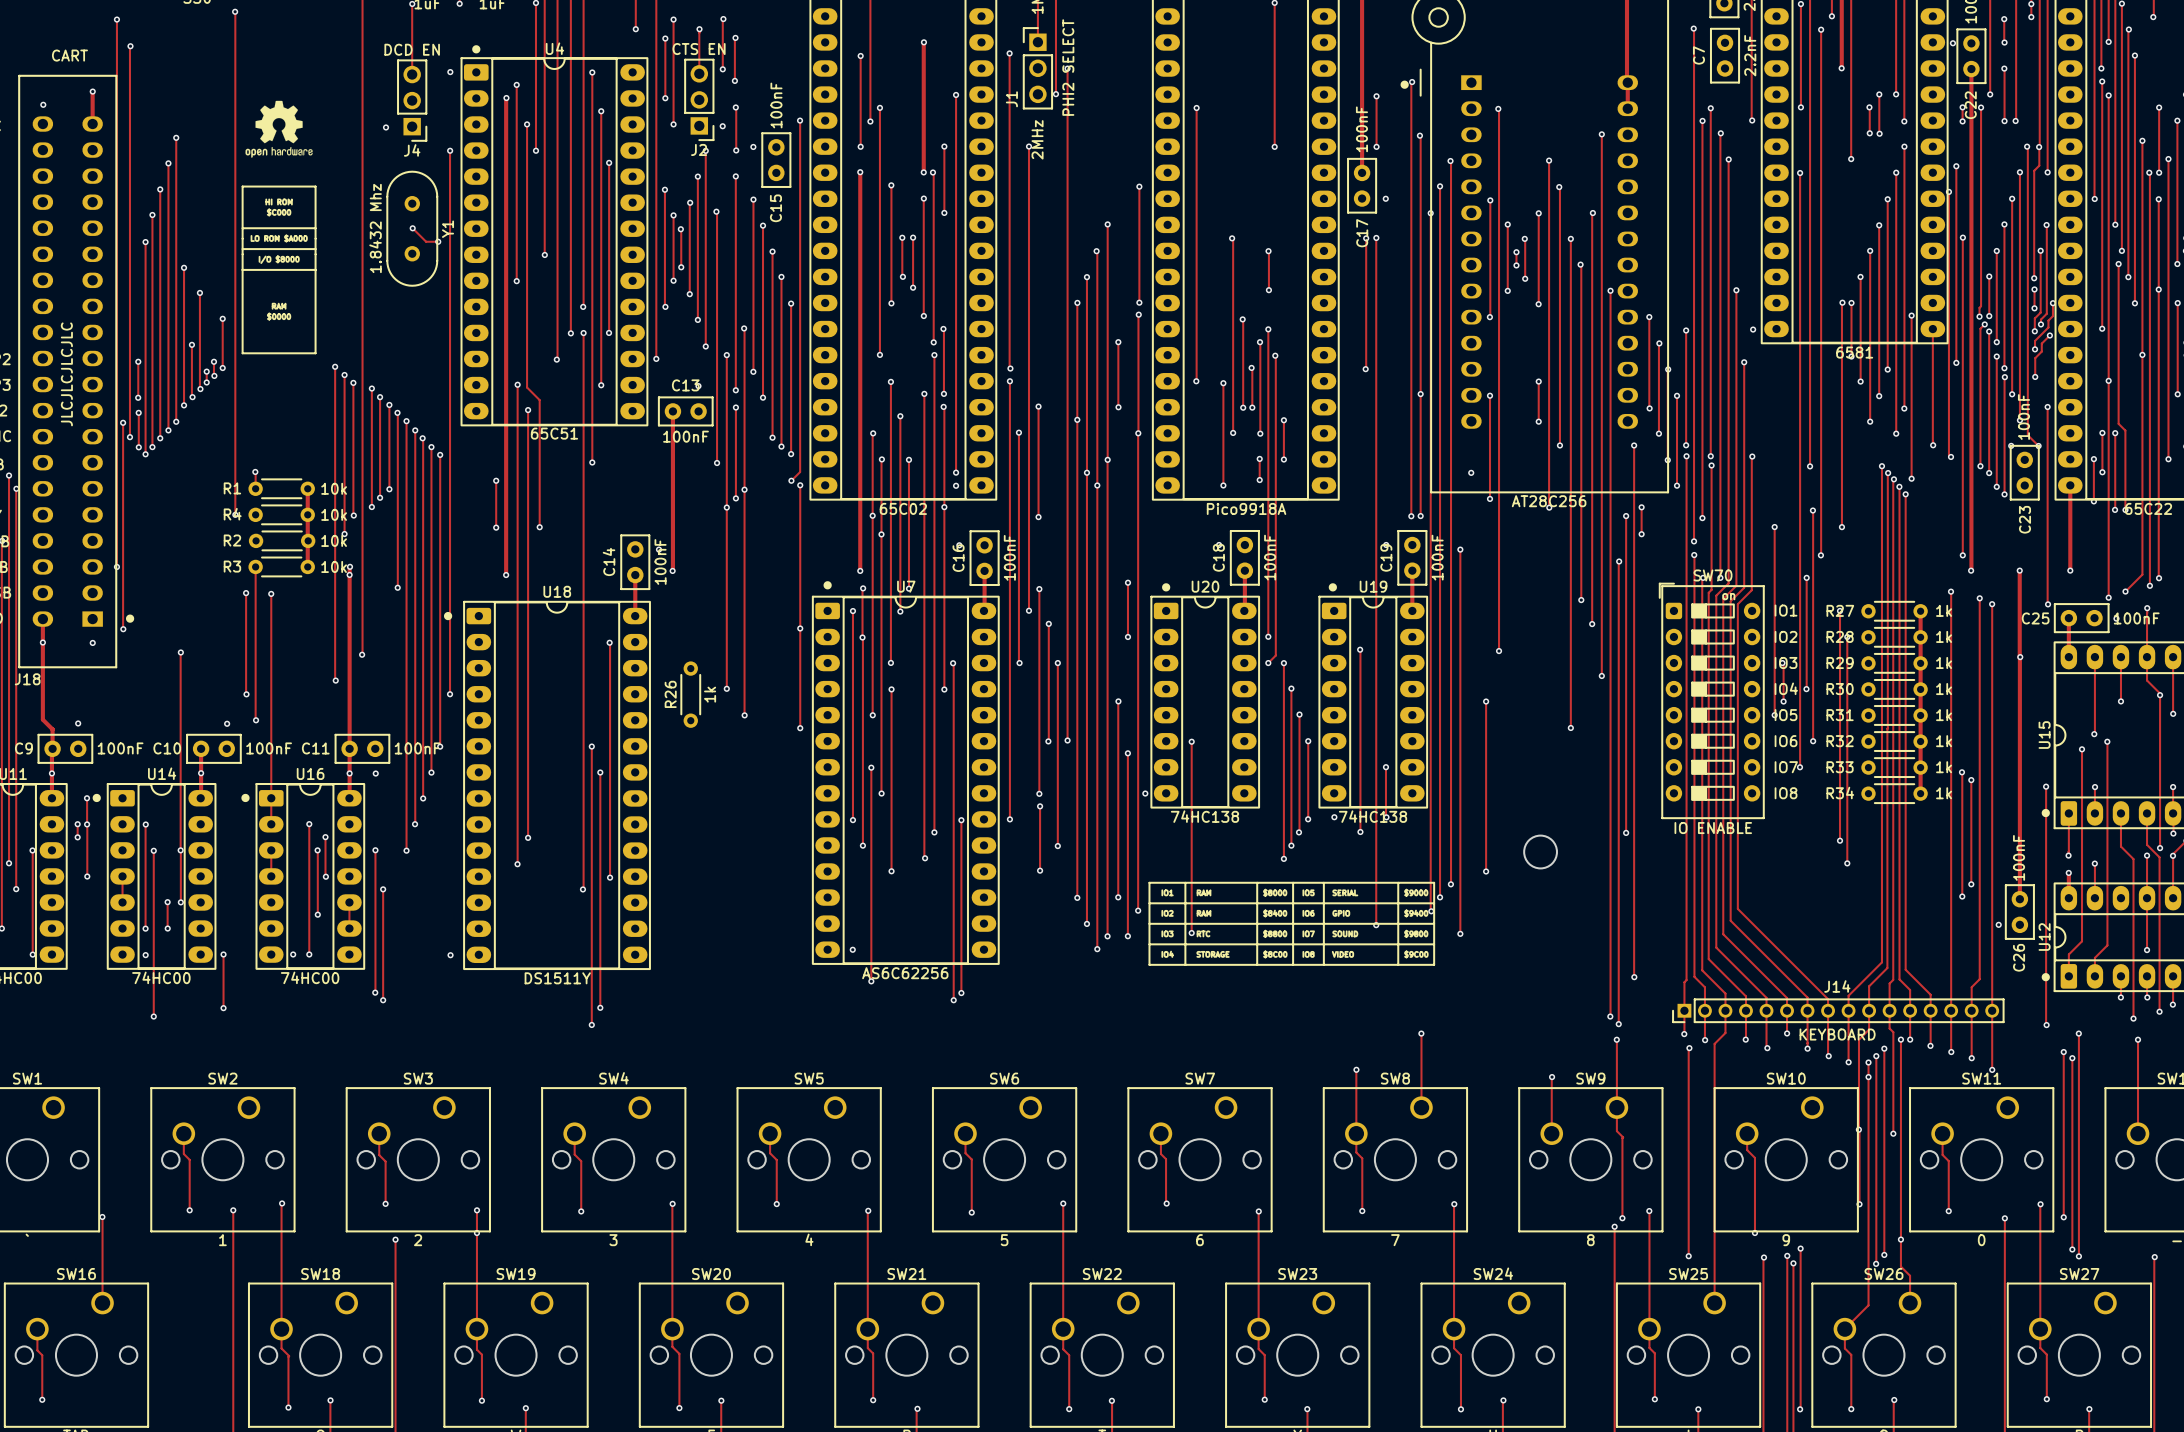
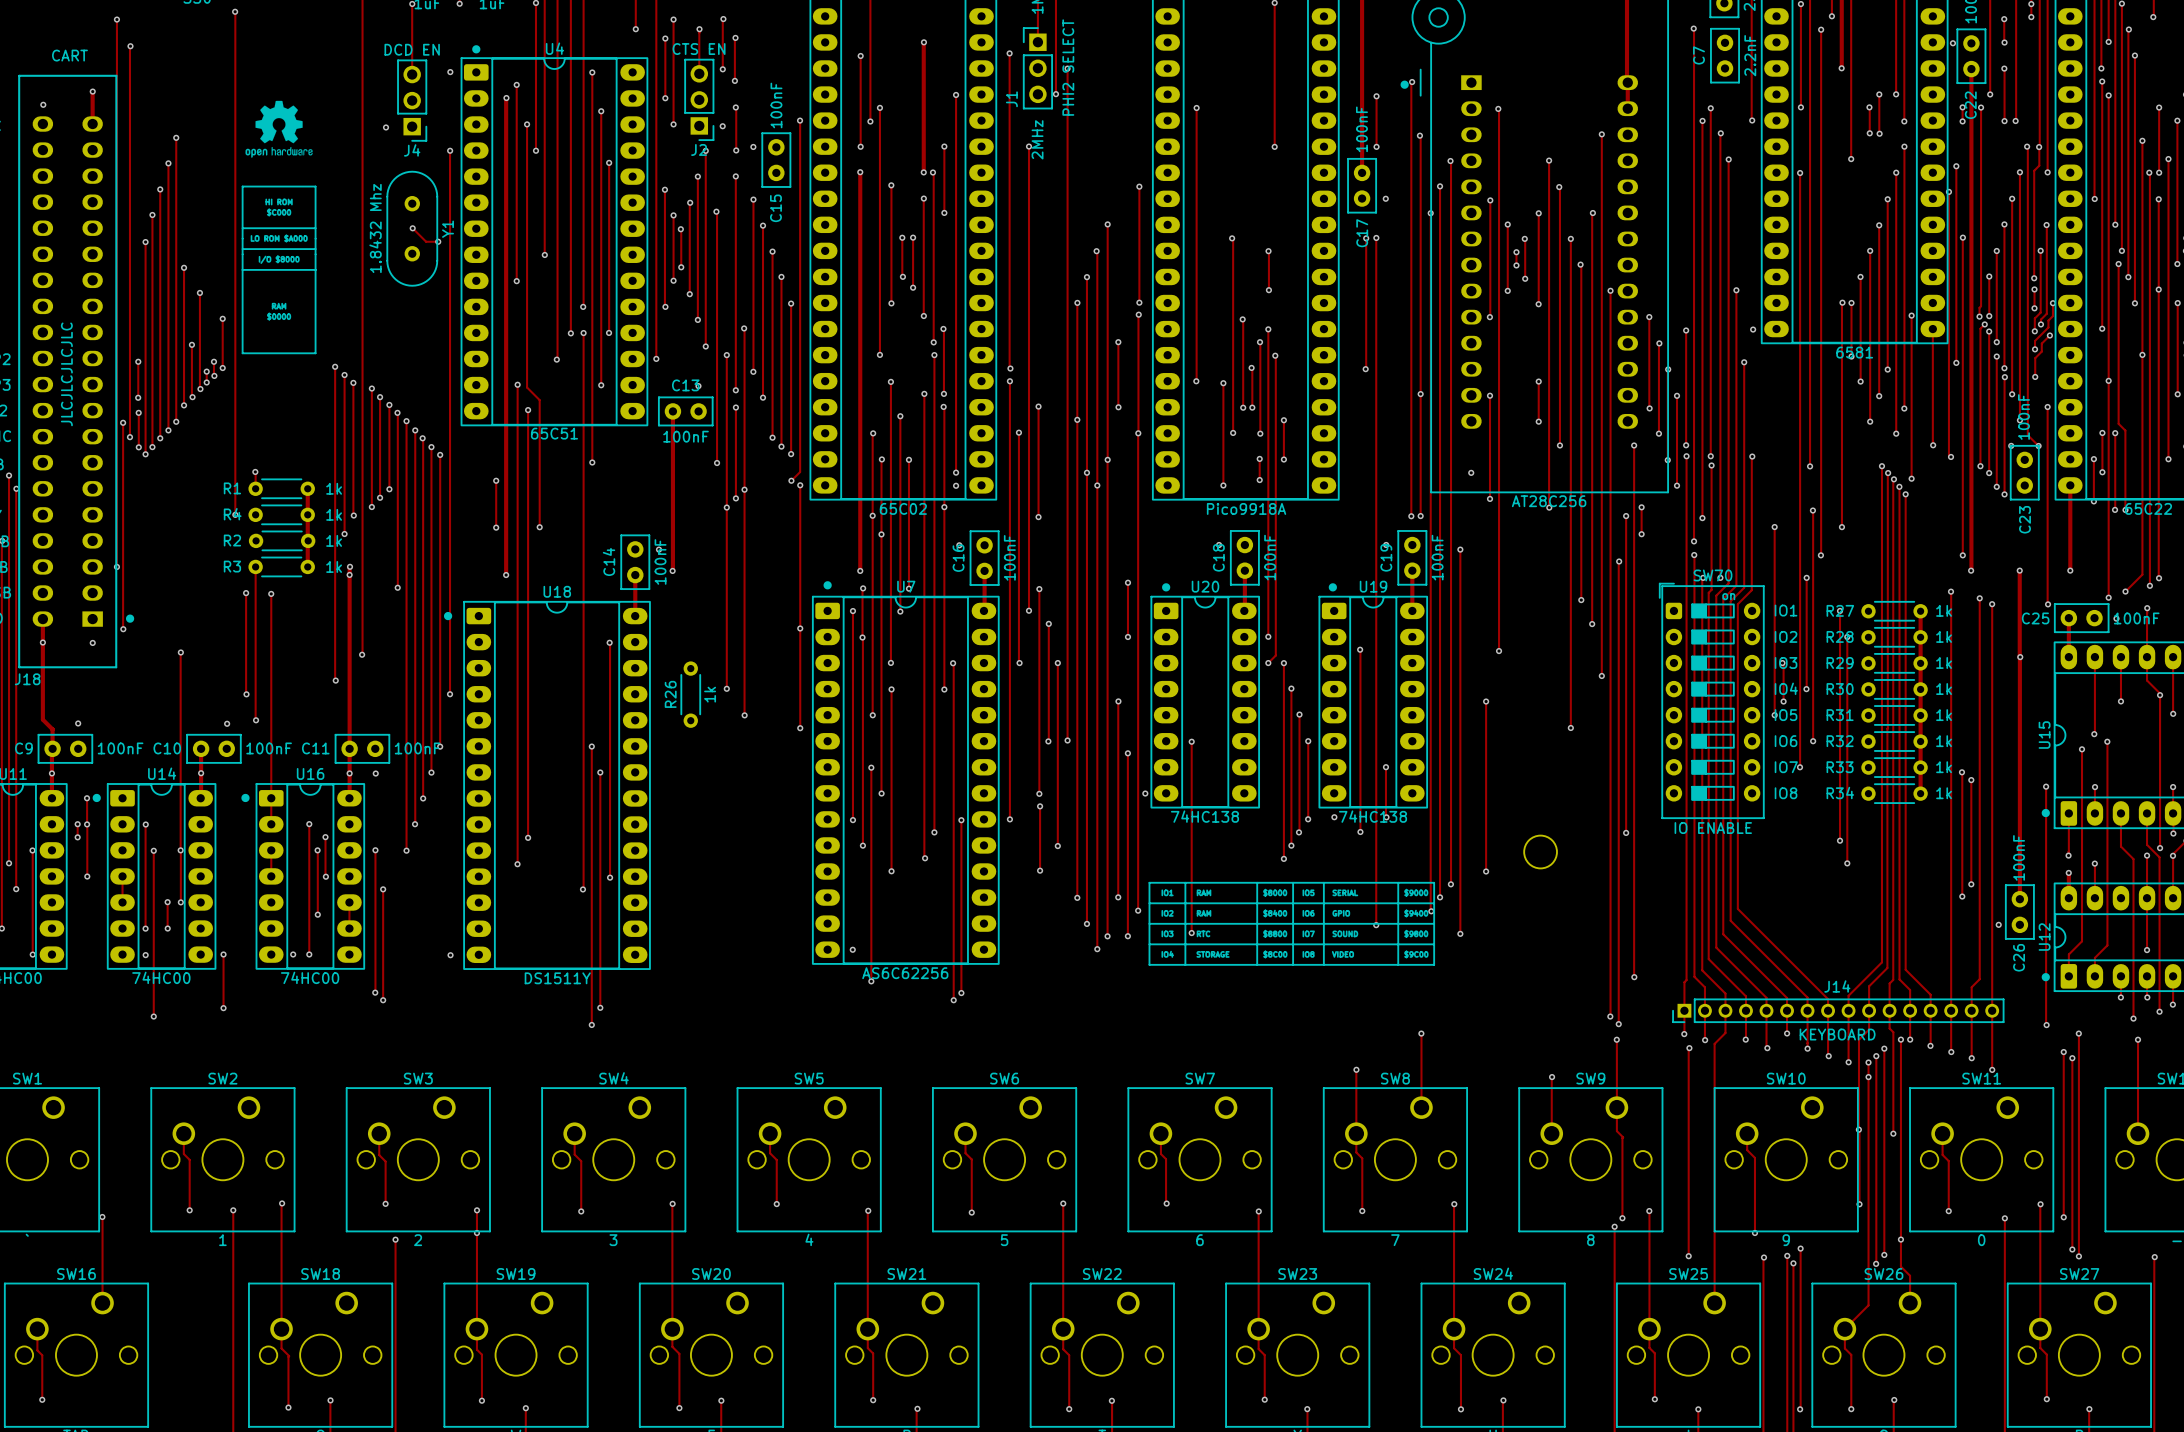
R1 value: 10k (334, 488) -> 1k (334, 488)
R4 value: 10k (334, 514) -> 1k (334, 514)
R2 value: 10k (334, 540) -> 1k (334, 540)
R3 value: 10k (334, 566) -> 1k (334, 566)

